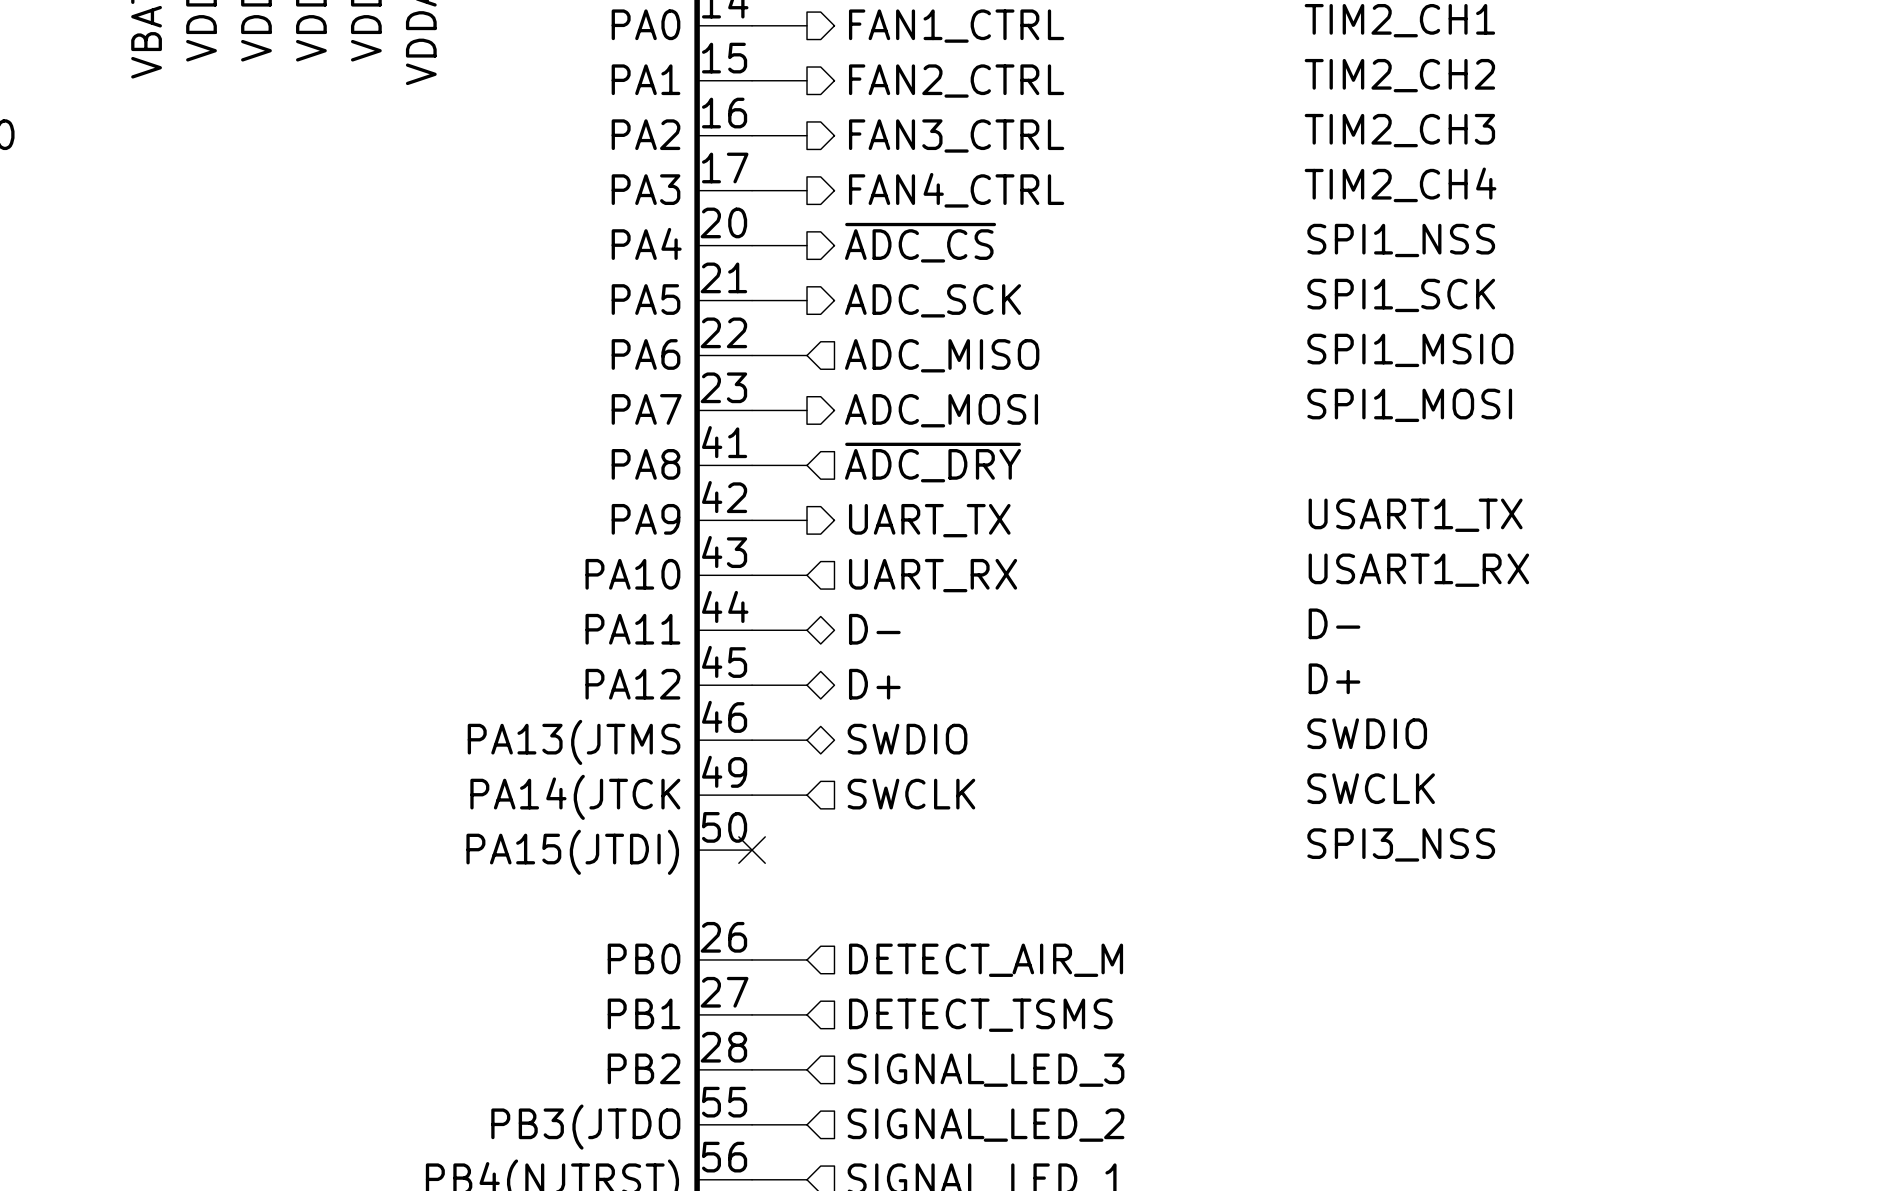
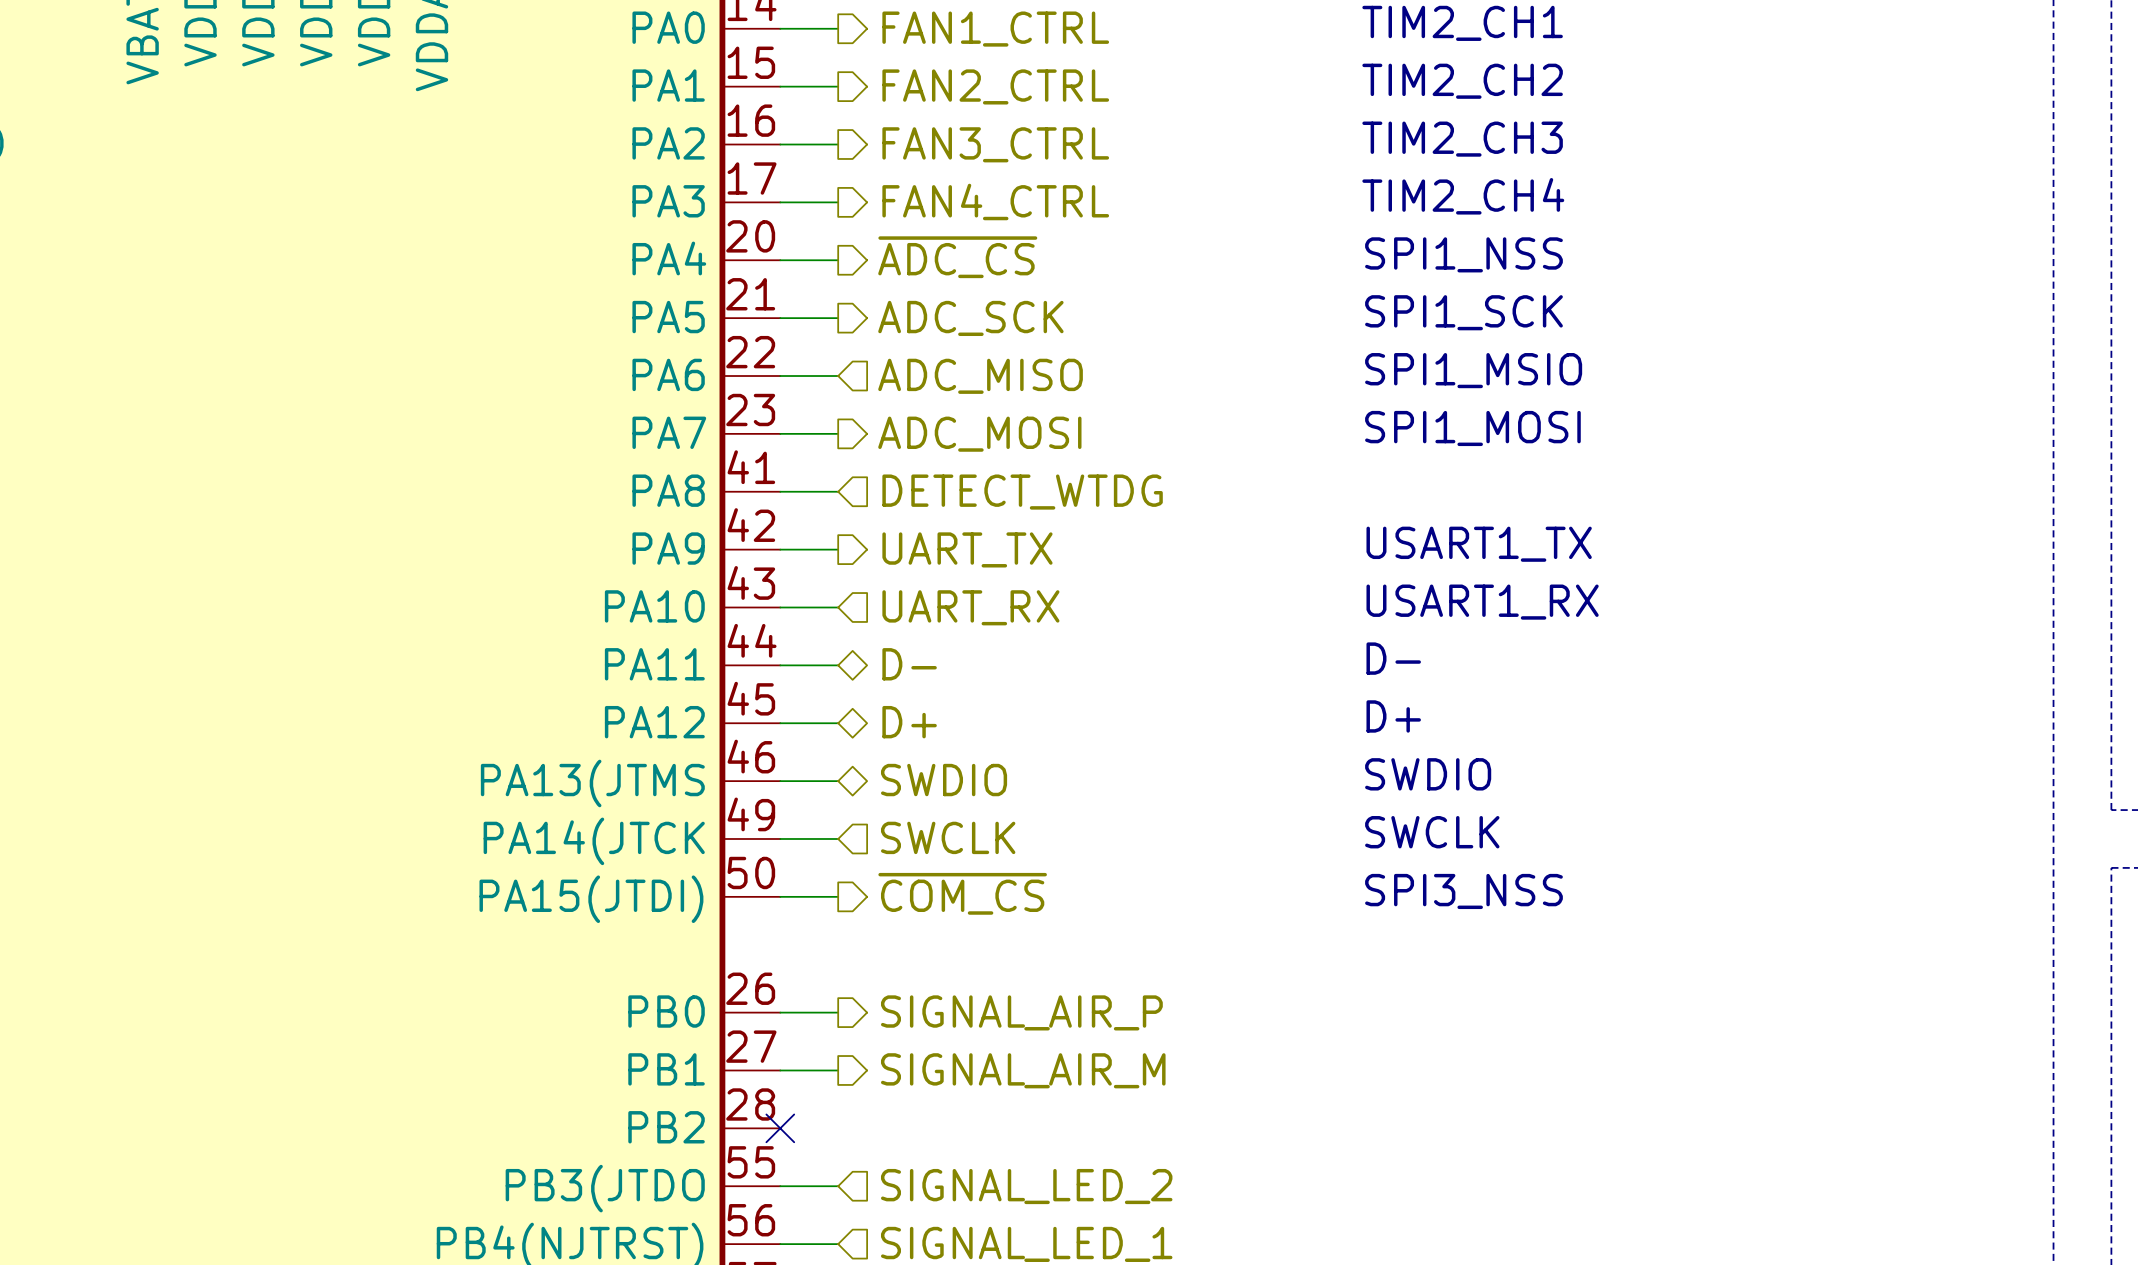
hierarchical label: ~{ADC_DRY} (933, 462) -> DETECT_WTDG (1022, 492)
hierarchical label: none -> ~{COM_CS} (962, 893)
no-connect mark: (752, 850) -> none
hierarchical label shape: input (986, 960) -> output (1021, 1012)
hierarchical label: DETECT_AIR_M (986, 960) -> SIGNAL_AIR_P (1021, 1012)
hierarchical label shape: input (980, 1015) -> output (1023, 1070)
hierarchical label: DETECT_TSMS (980, 1015) -> SIGNAL_AIR_M (1023, 1070)
wire: (752, 1069) (807, 1069) -> (780, 896) (838, 896)
no-connect mark: none -> (780, 1128)
hierarchical label: SIGNAL_LED_3 (986, 1070) -> none

